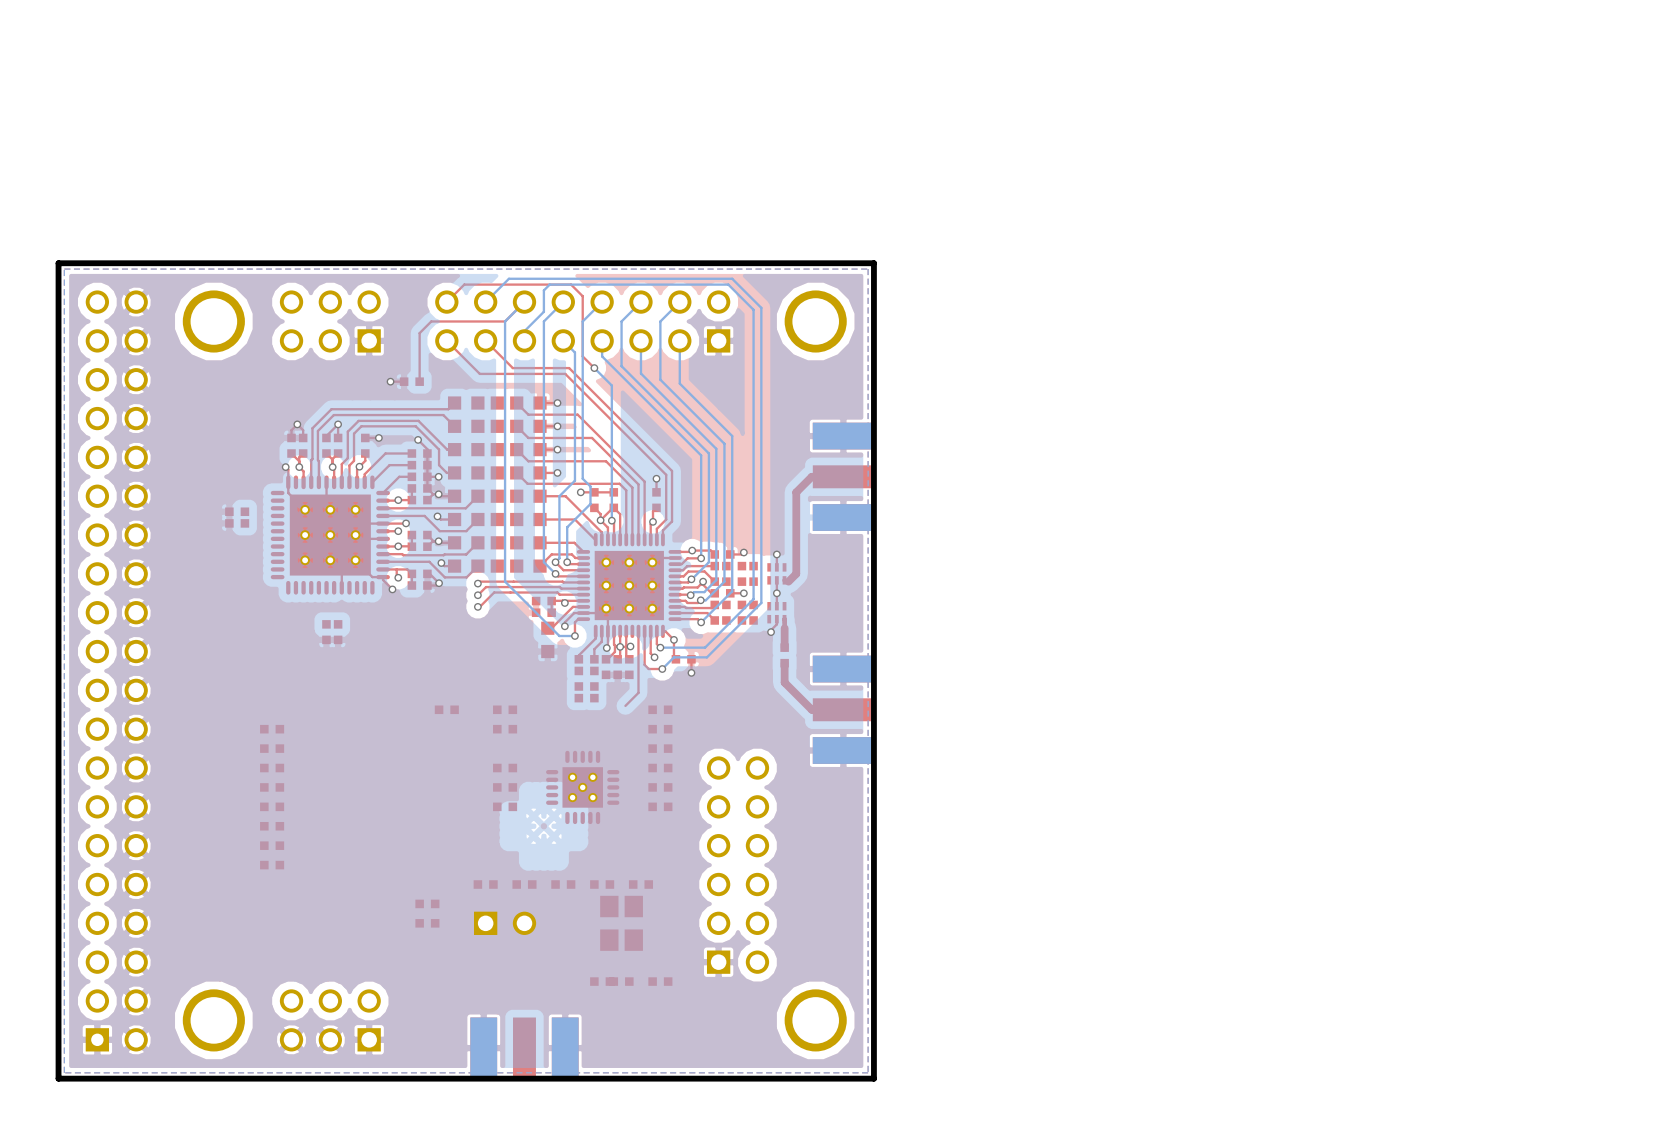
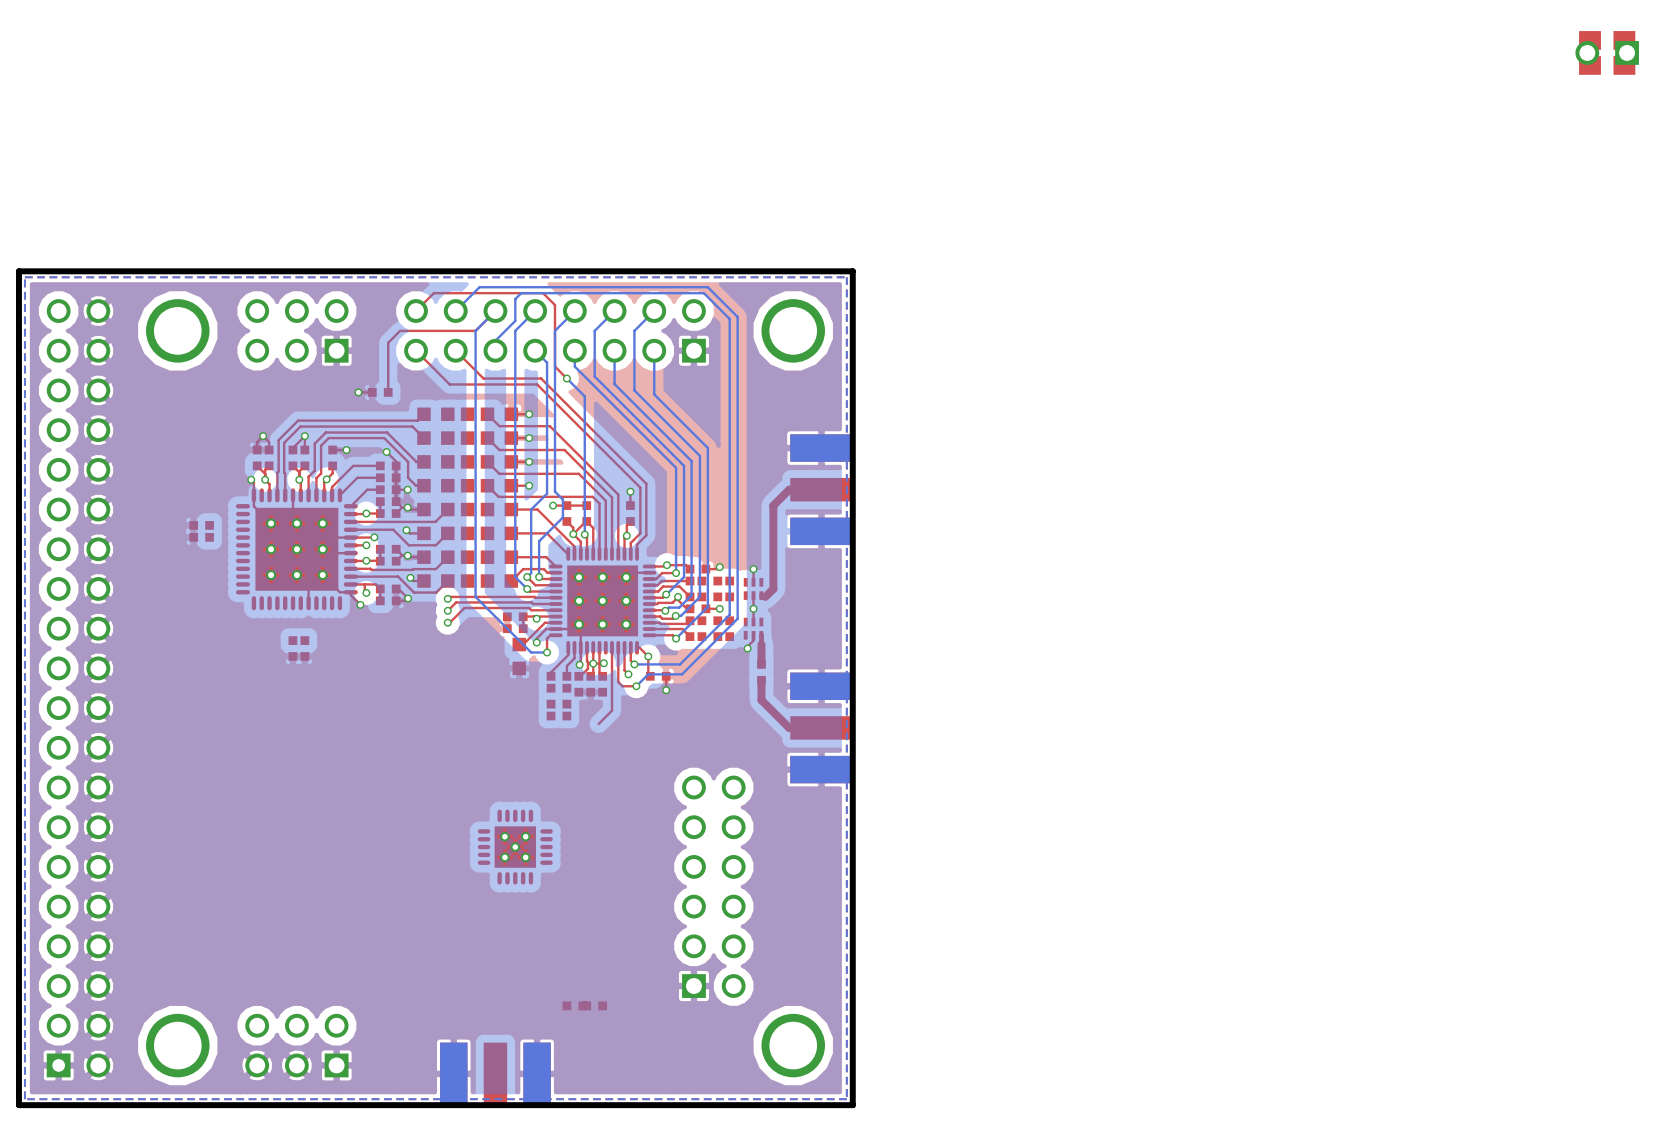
part: none -> (1607, 52)
part: none -> (1607, 52)
part: (446, 709) -> none
part: (505, 709) -> none
part: (660, 709) -> none
part: (272, 729) -> none
part: (505, 729) -> none
part: (660, 729) -> none
part: (272, 748) -> none
part: (660, 748) -> none
part: (272, 768) -> none
part: (505, 768) -> none
part: (660, 768) -> none
part: (272, 787) -> none
part: (505, 787) -> none
part position: (582, 787) -> (515, 847)
part: (660, 787) -> none
part: (272, 806) -> none
part: (505, 806) -> none
part: (660, 806) -> none
part: (272, 826) -> none
part: (272, 845) -> none
part: (272, 865) -> none
part: (485, 884) -> none
part: (524, 884) -> none
part: (563, 884) -> none
part: (602, 884) -> none
part: (640, 884) -> none
part: (427, 903) -> none
part: (427, 923) -> none
part: (505, 923) -> none
part: (621, 923) -> none
part: (660, 981) -> none

